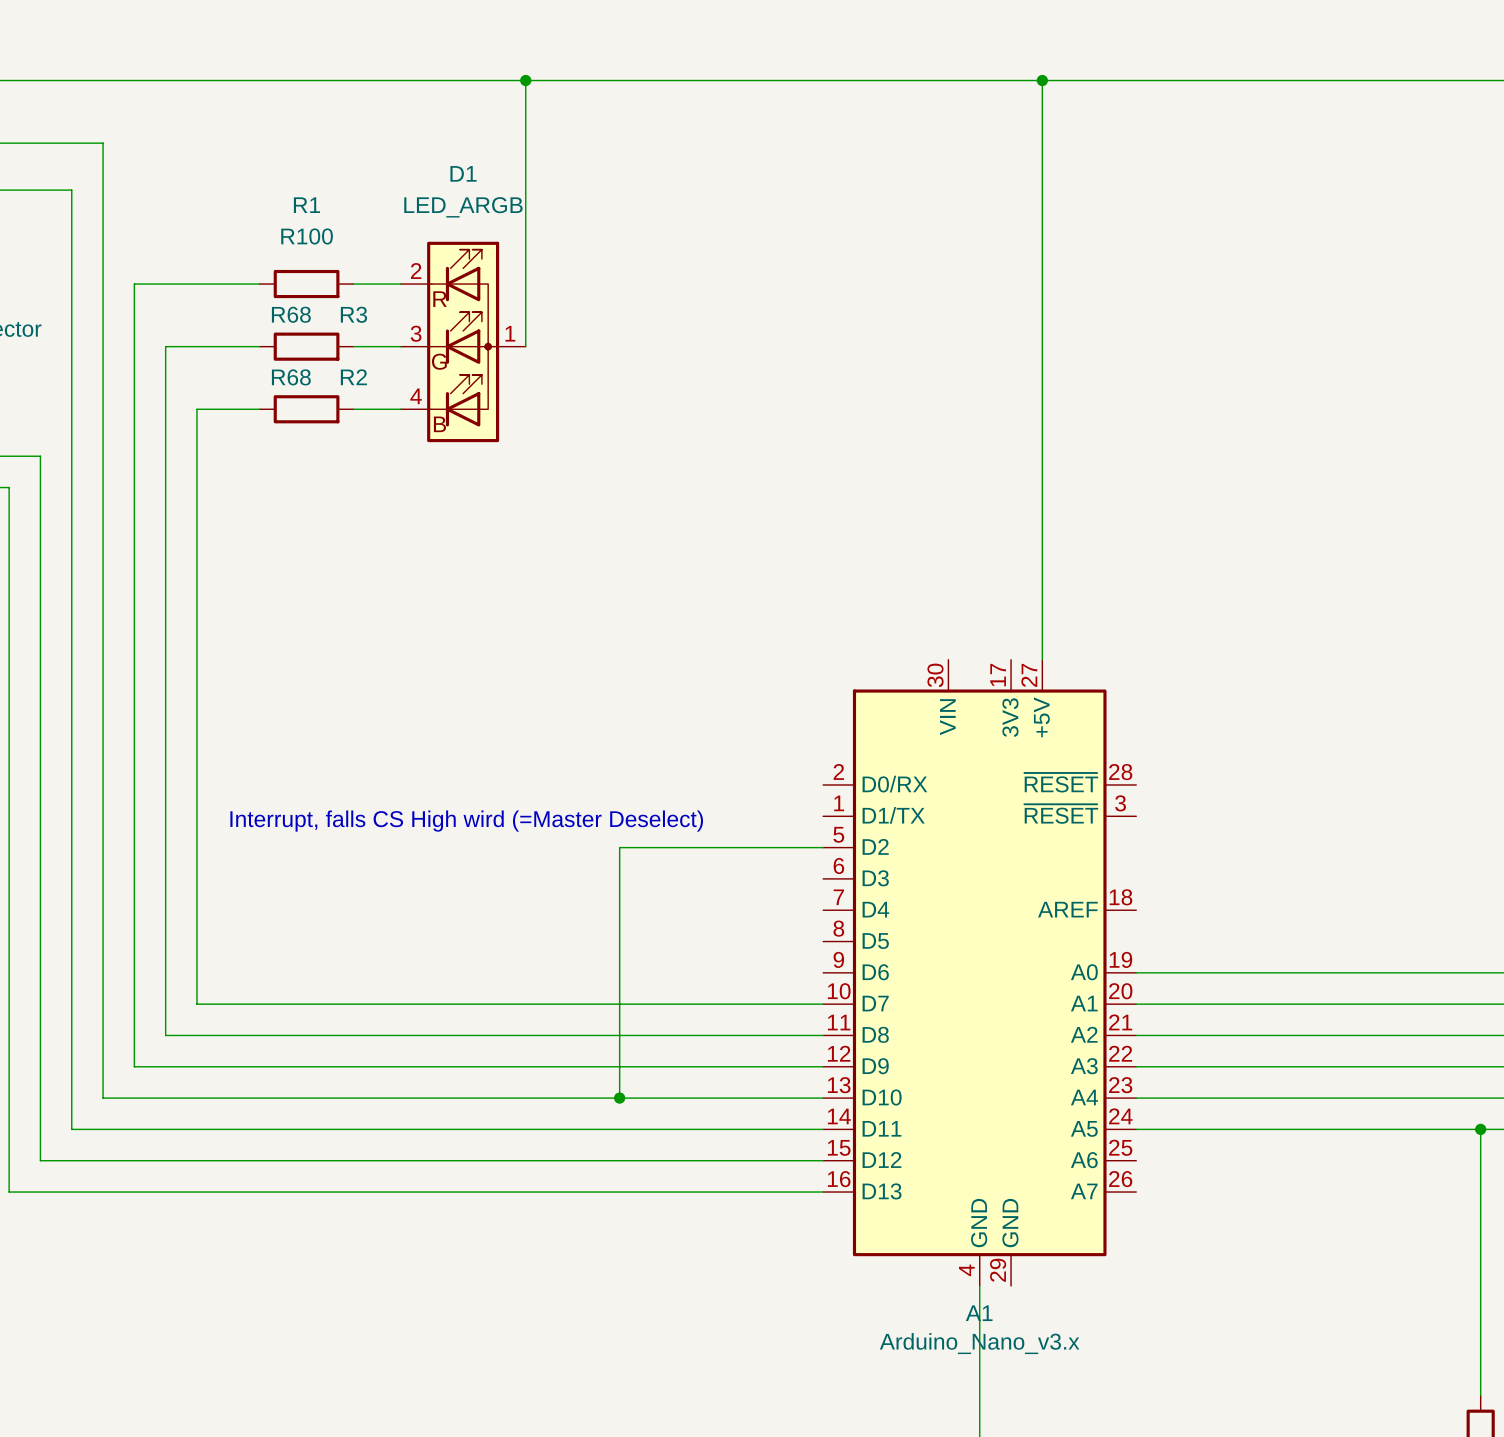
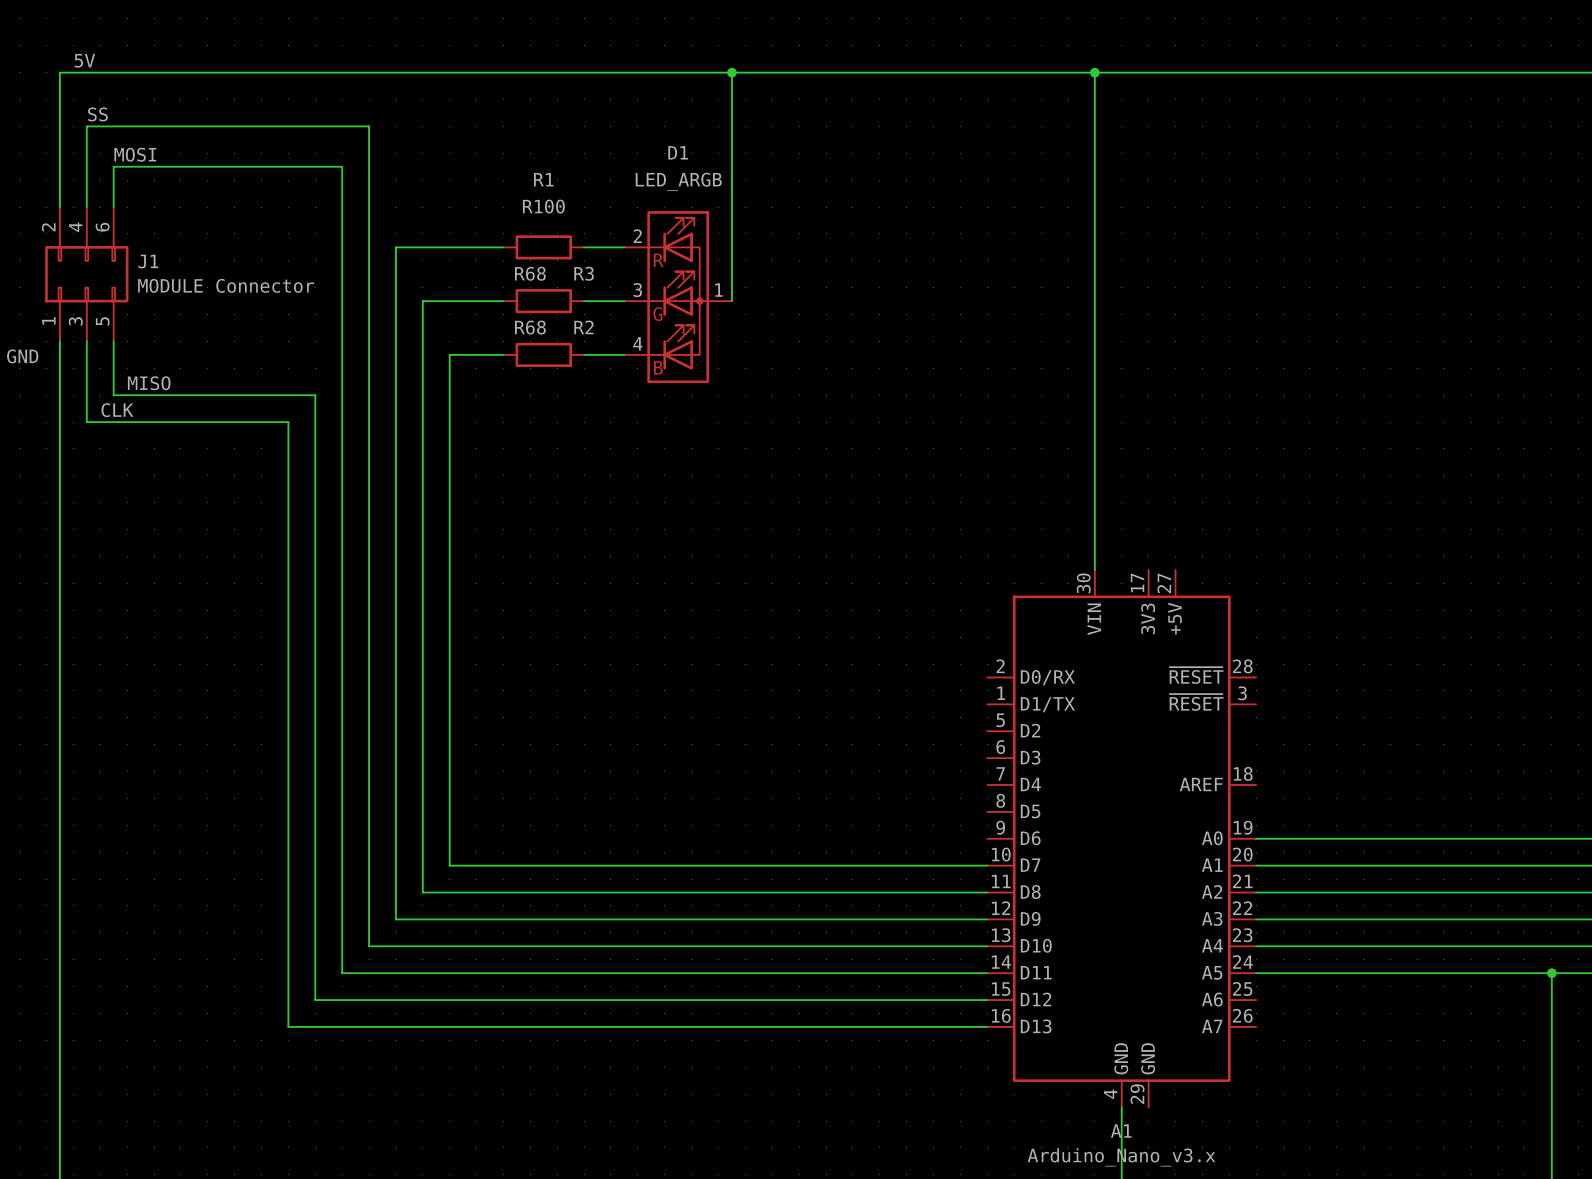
junction: none -> (1094, 72)
wire: (1042, 80) (1042, 659) -> (1094, 72) (1094, 569)
junction: (1042, 80) -> none
text: Interrupt, falls CS High wird (=Master Deselect) (466, 821) -> none
wire: (823, 847) (619, 847) (619, 1098) -> none
junction: (619, 1098) -> none

